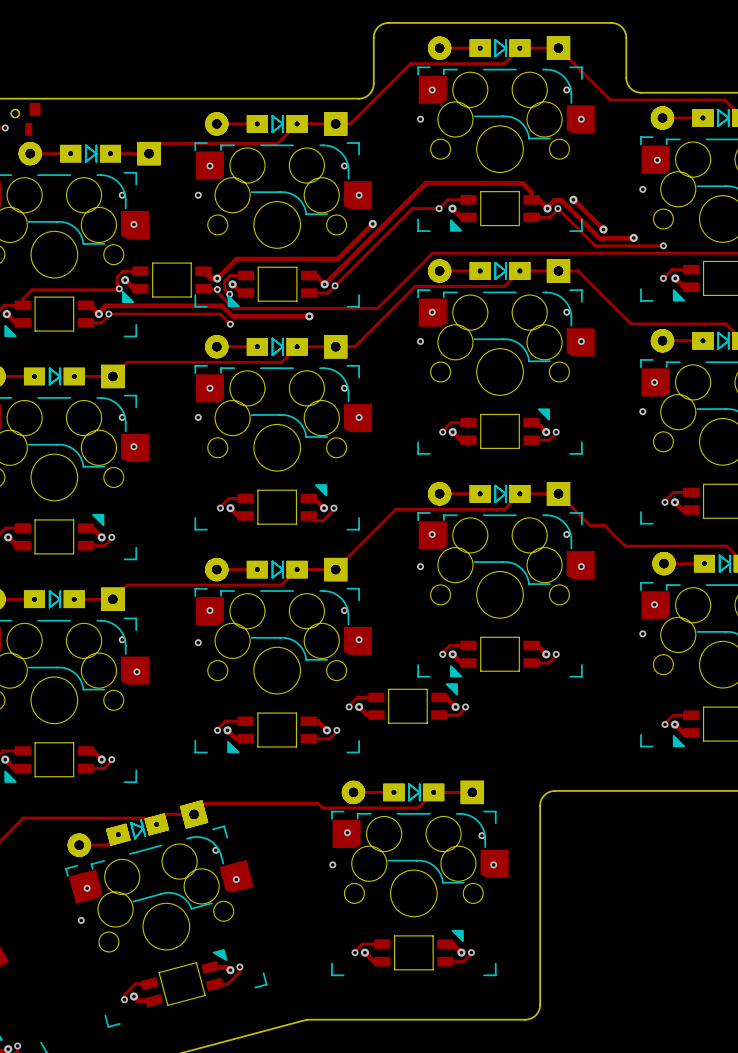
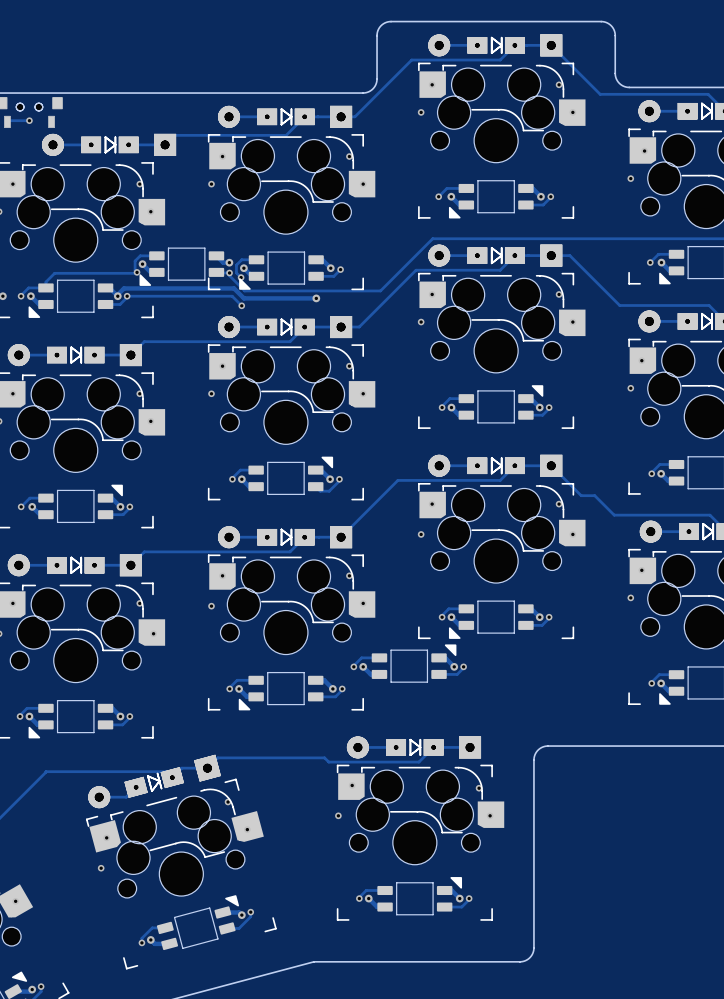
track: (531, 199) (531, 192) (522, 183) (425, 183) (324, 284) -> none
track: (573, 199) (603, 229) -> none
via: (573, 199) -> none
track: (547, 207) (554, 200) (561, 200) (599, 238) (633, 237) -> none
track: (439, 208) (412, 208) (335, 285) -> none
track: (557, 208) (595, 245) (663, 245) -> none
track: (372, 223) (337, 259) (236, 259) (217, 278) -> none
via: (372, 223) -> none
via: (603, 229) -> none
via: (633, 237) -> none
via: (663, 245) -> none

